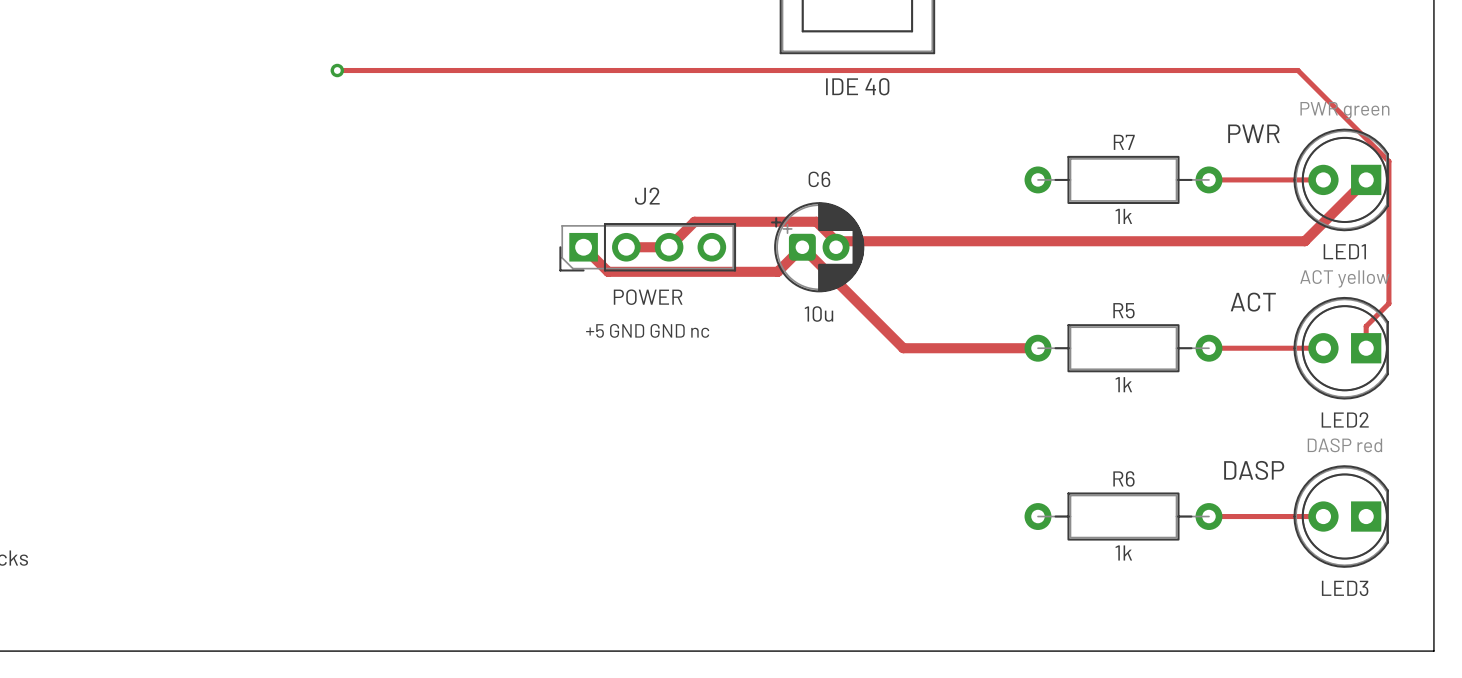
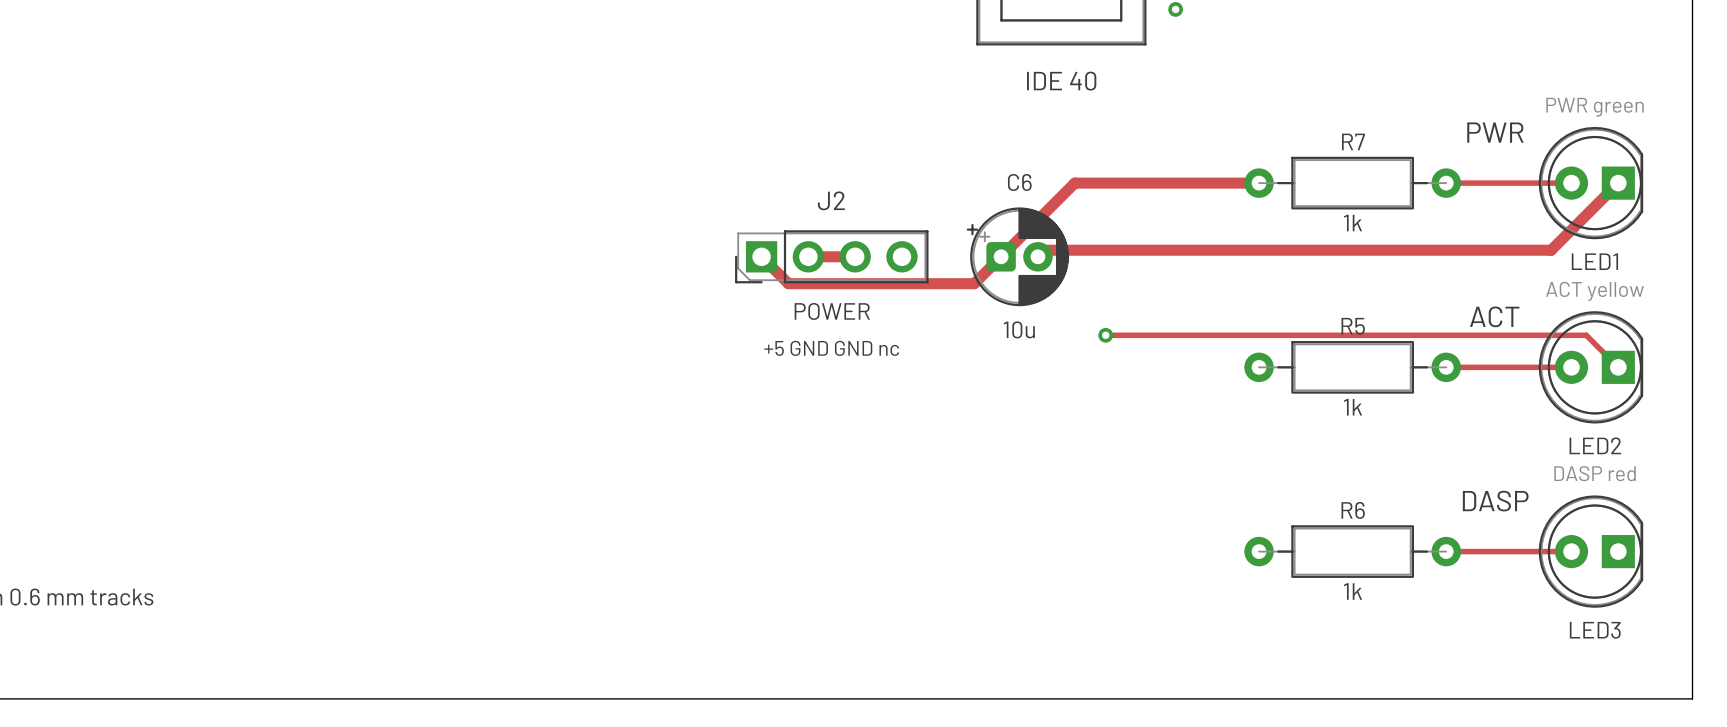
via: none -> (1175, 9)
track: (337, 70) (1298, 70) (1388, 161) (1388, 303) (1366, 326) (1366, 348) -> (1105, 335) (1586, 335) (1618, 367)
via: (337, 70) -> none
track: (669, 247) (694, 221) (816, 221) (836, 241) (836, 247) -> none
track: (802, 247) (903, 348) (1038, 348) -> (1001, 256) (1074, 183) (1259, 183)
via: none -> (1105, 335)

